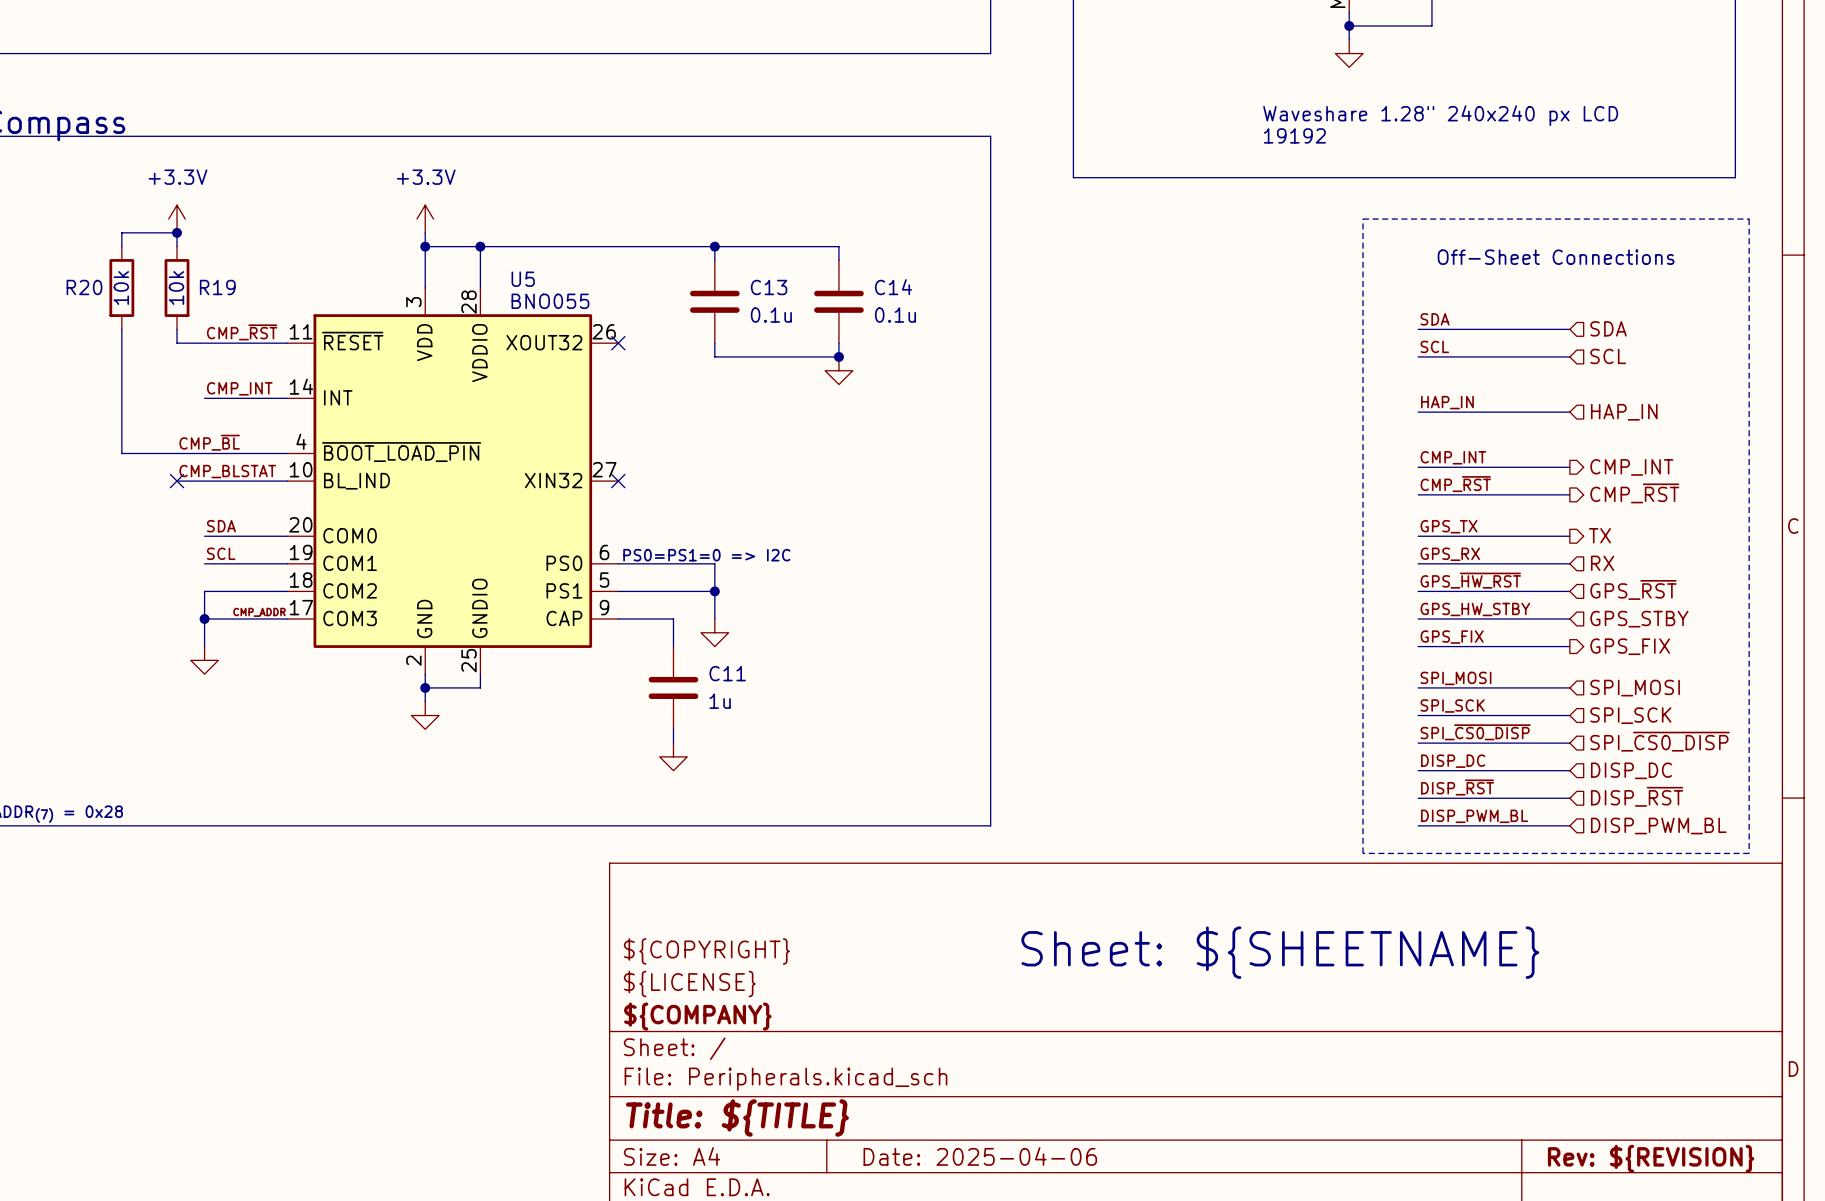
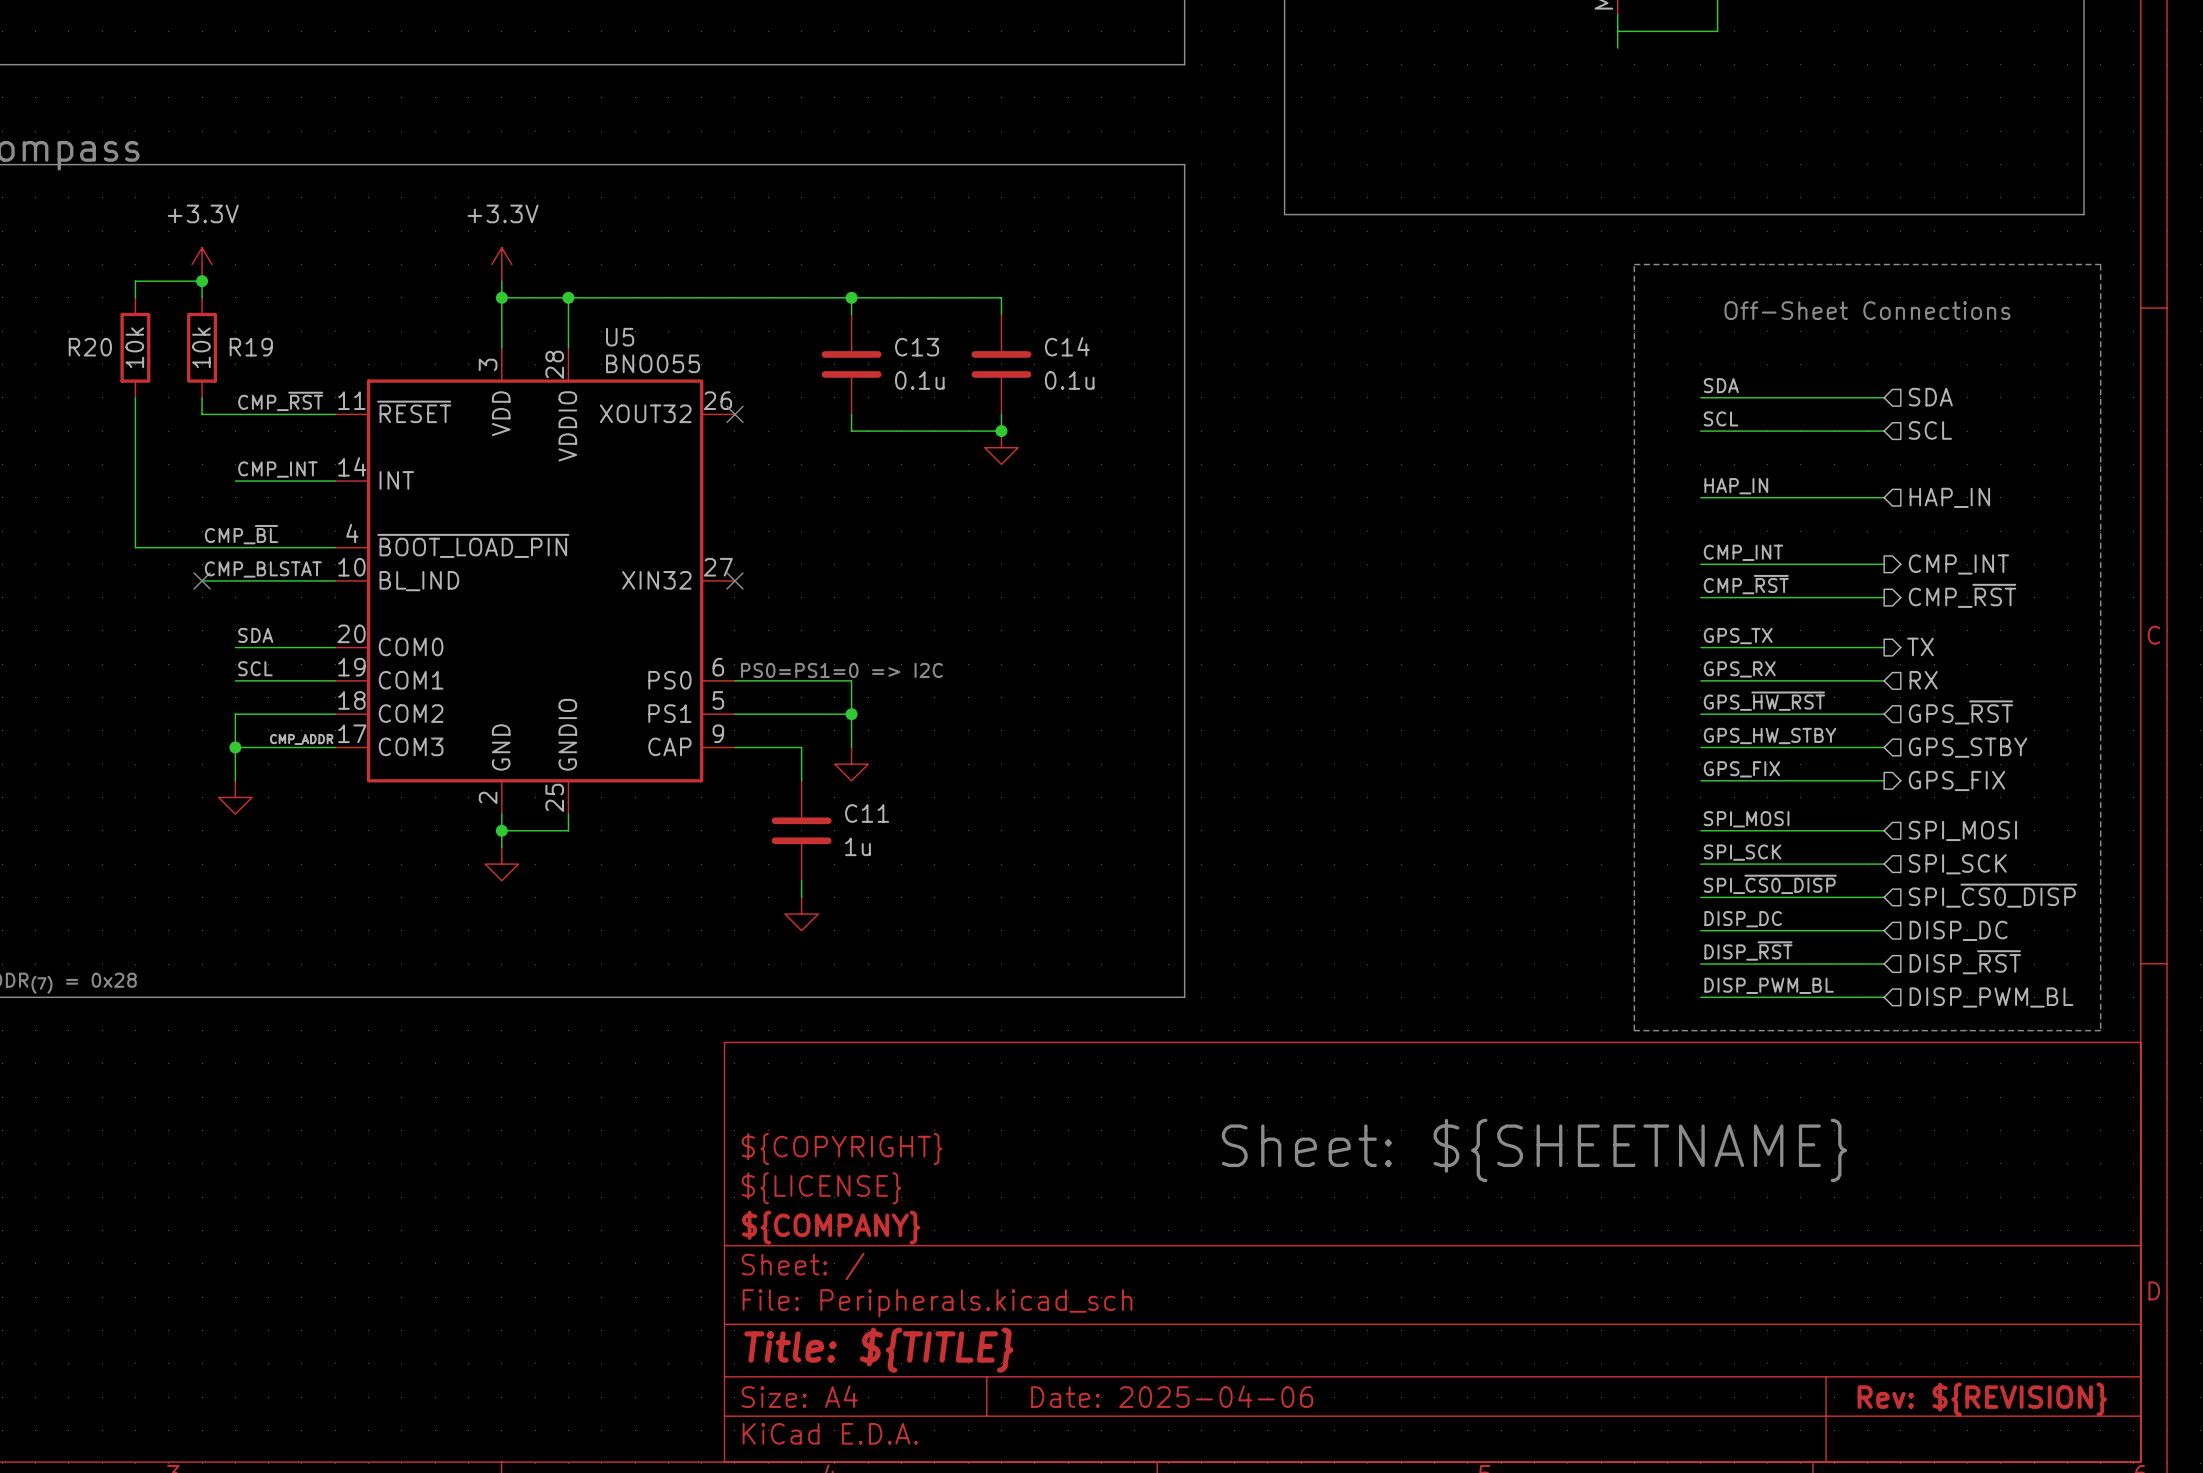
junction: (1349, 25) -> none
power symbol: (1349, 53) -> none
text: Waveshare 1.28" 240x240 px LCD (1440, 115) -> none
text: 19192 (1294, 135) -> none

